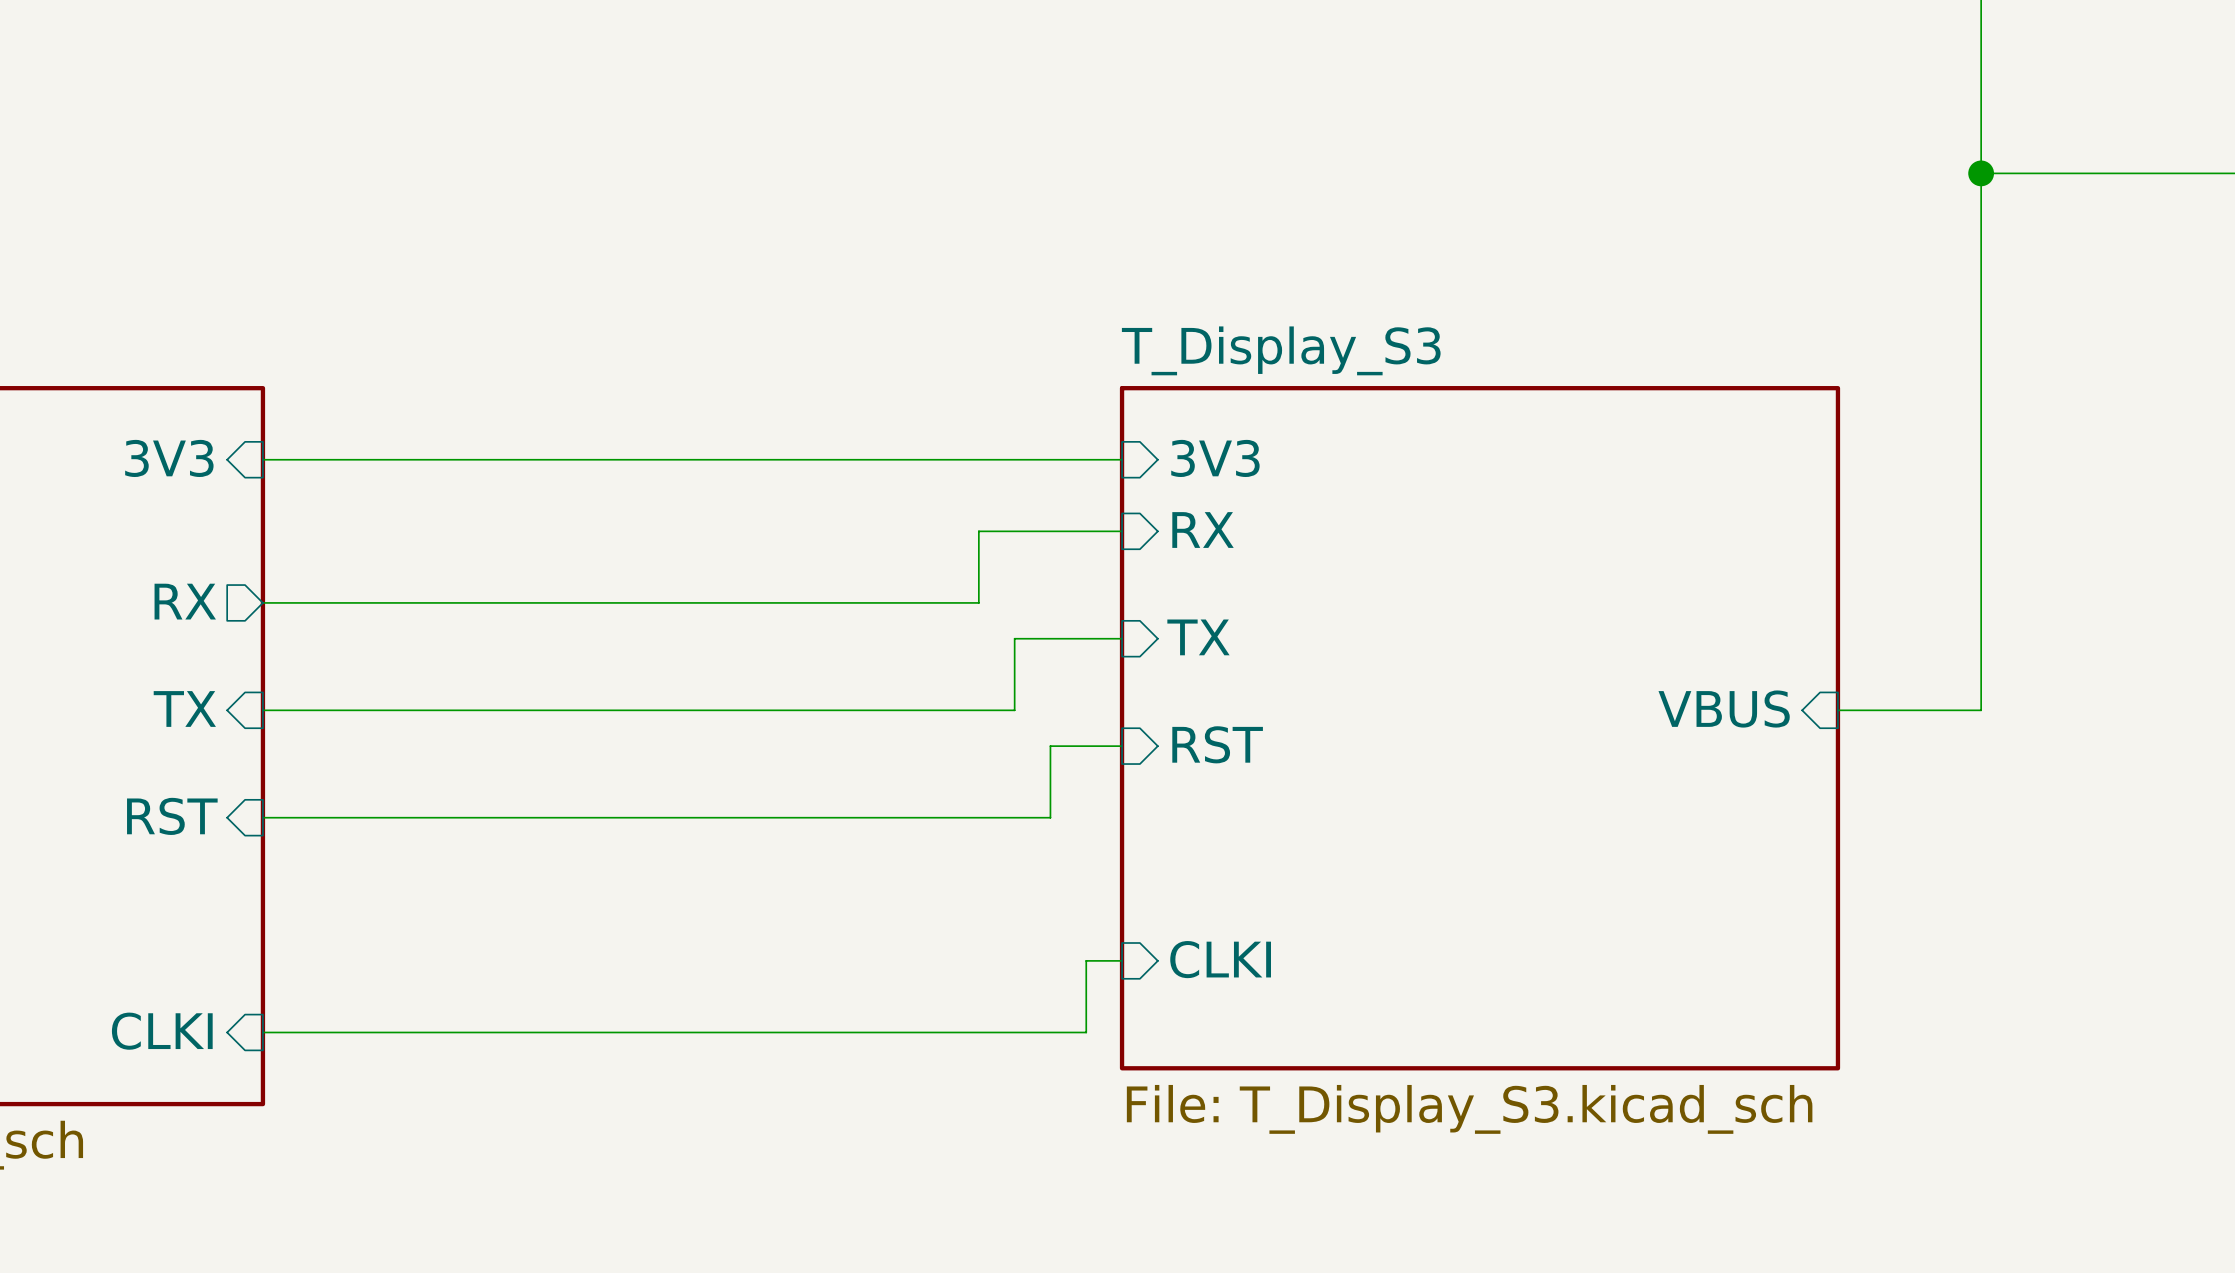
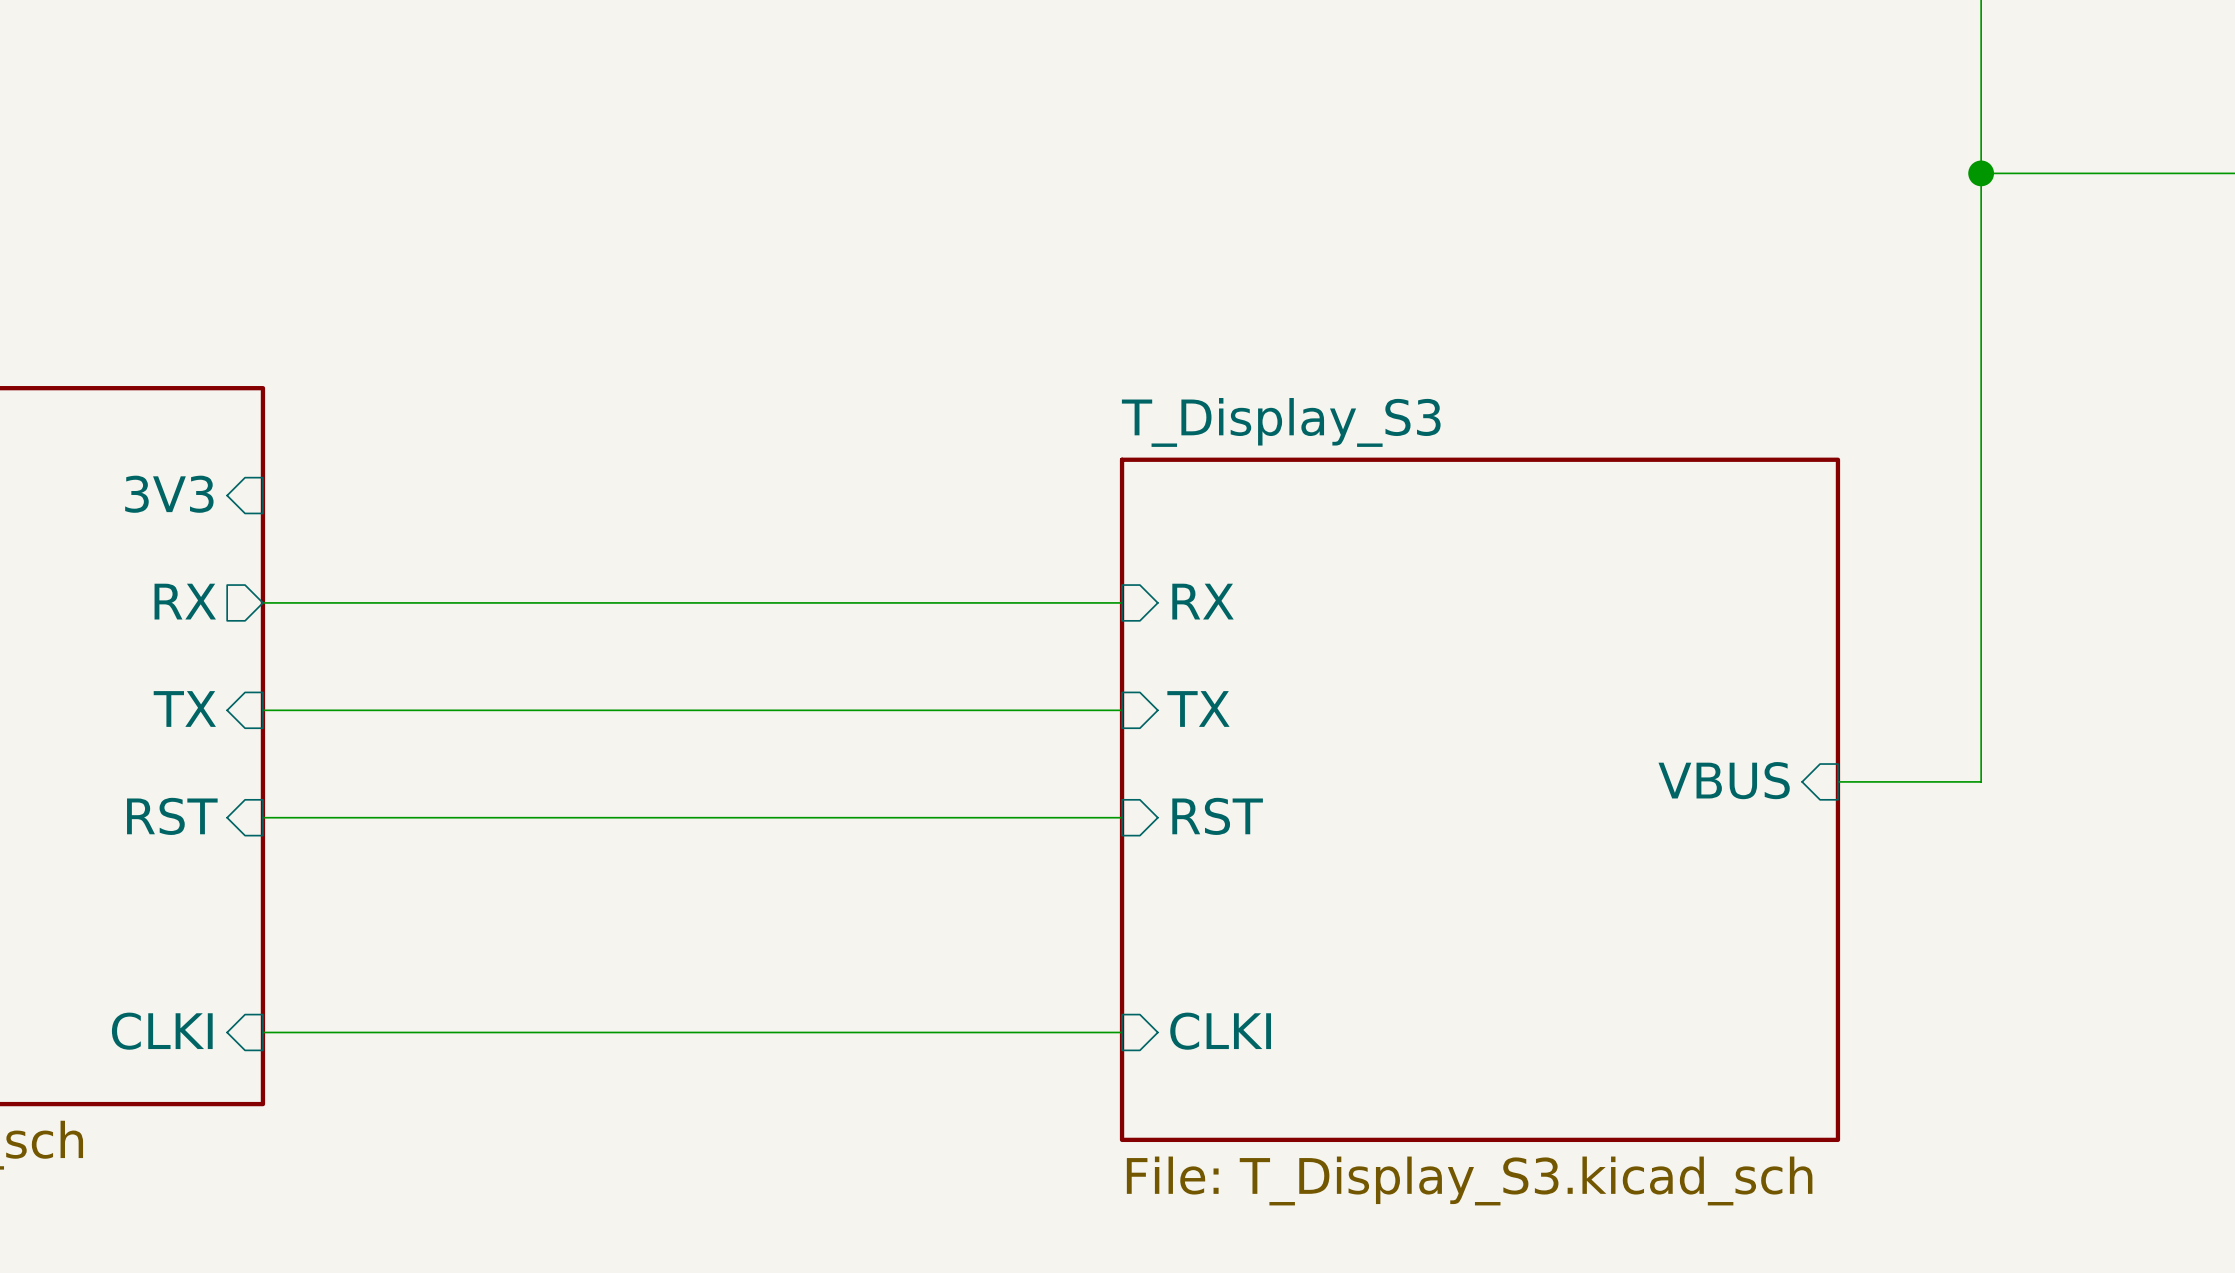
sheet pin position: 3V3 (169, 458) -> 3V3 (169, 494)
sheet pin: 3V3 (1215, 458) -> none
wire: (262, 459) (1122, 459) -> none
sheet pin position: RX (1203, 530) -> RX (1203, 601)
wire: (1122, 531) (978, 531) (978, 602) -> (1122, 602) (978, 602)
sheet pin position: TX (1198, 637) -> TX (1198, 708)
wire: (1122, 638) (1014, 638) (1014, 710) -> (1122, 710) (1014, 710)
sheet pin position: VBUS (1724, 709) -> VBUS (1724, 780)
wire: (1837, 710) (1981, 710) -> (1837, 781) (1981, 781) (1981, 710)
sheet T_Display_S3 position: (1480, 728) -> (1480, 799)
sheet pin position: RST (1217, 744) -> RST (1217, 816)
wire: (1122, 746) (1050, 746) (1050, 817) -> (1122, 817) (1050, 817)
sheet pin position: CLKI (1220, 959) -> CLKI (1220, 1031)
wire: (1122, 960) (1086, 960) (1086, 1032) -> (1122, 1032) (1086, 1032)

